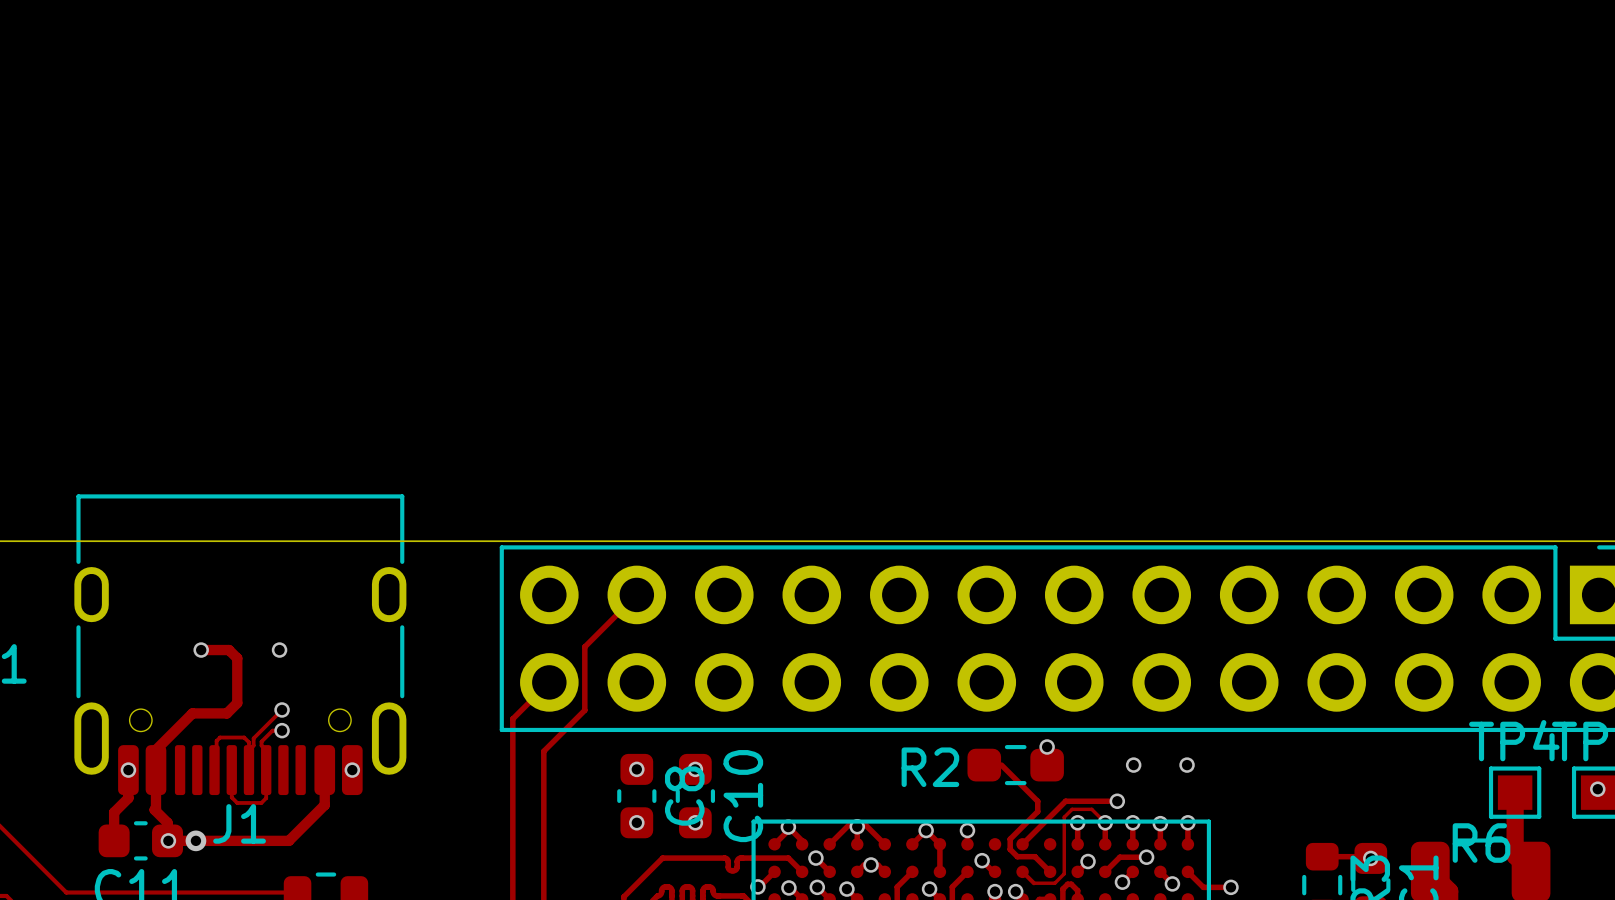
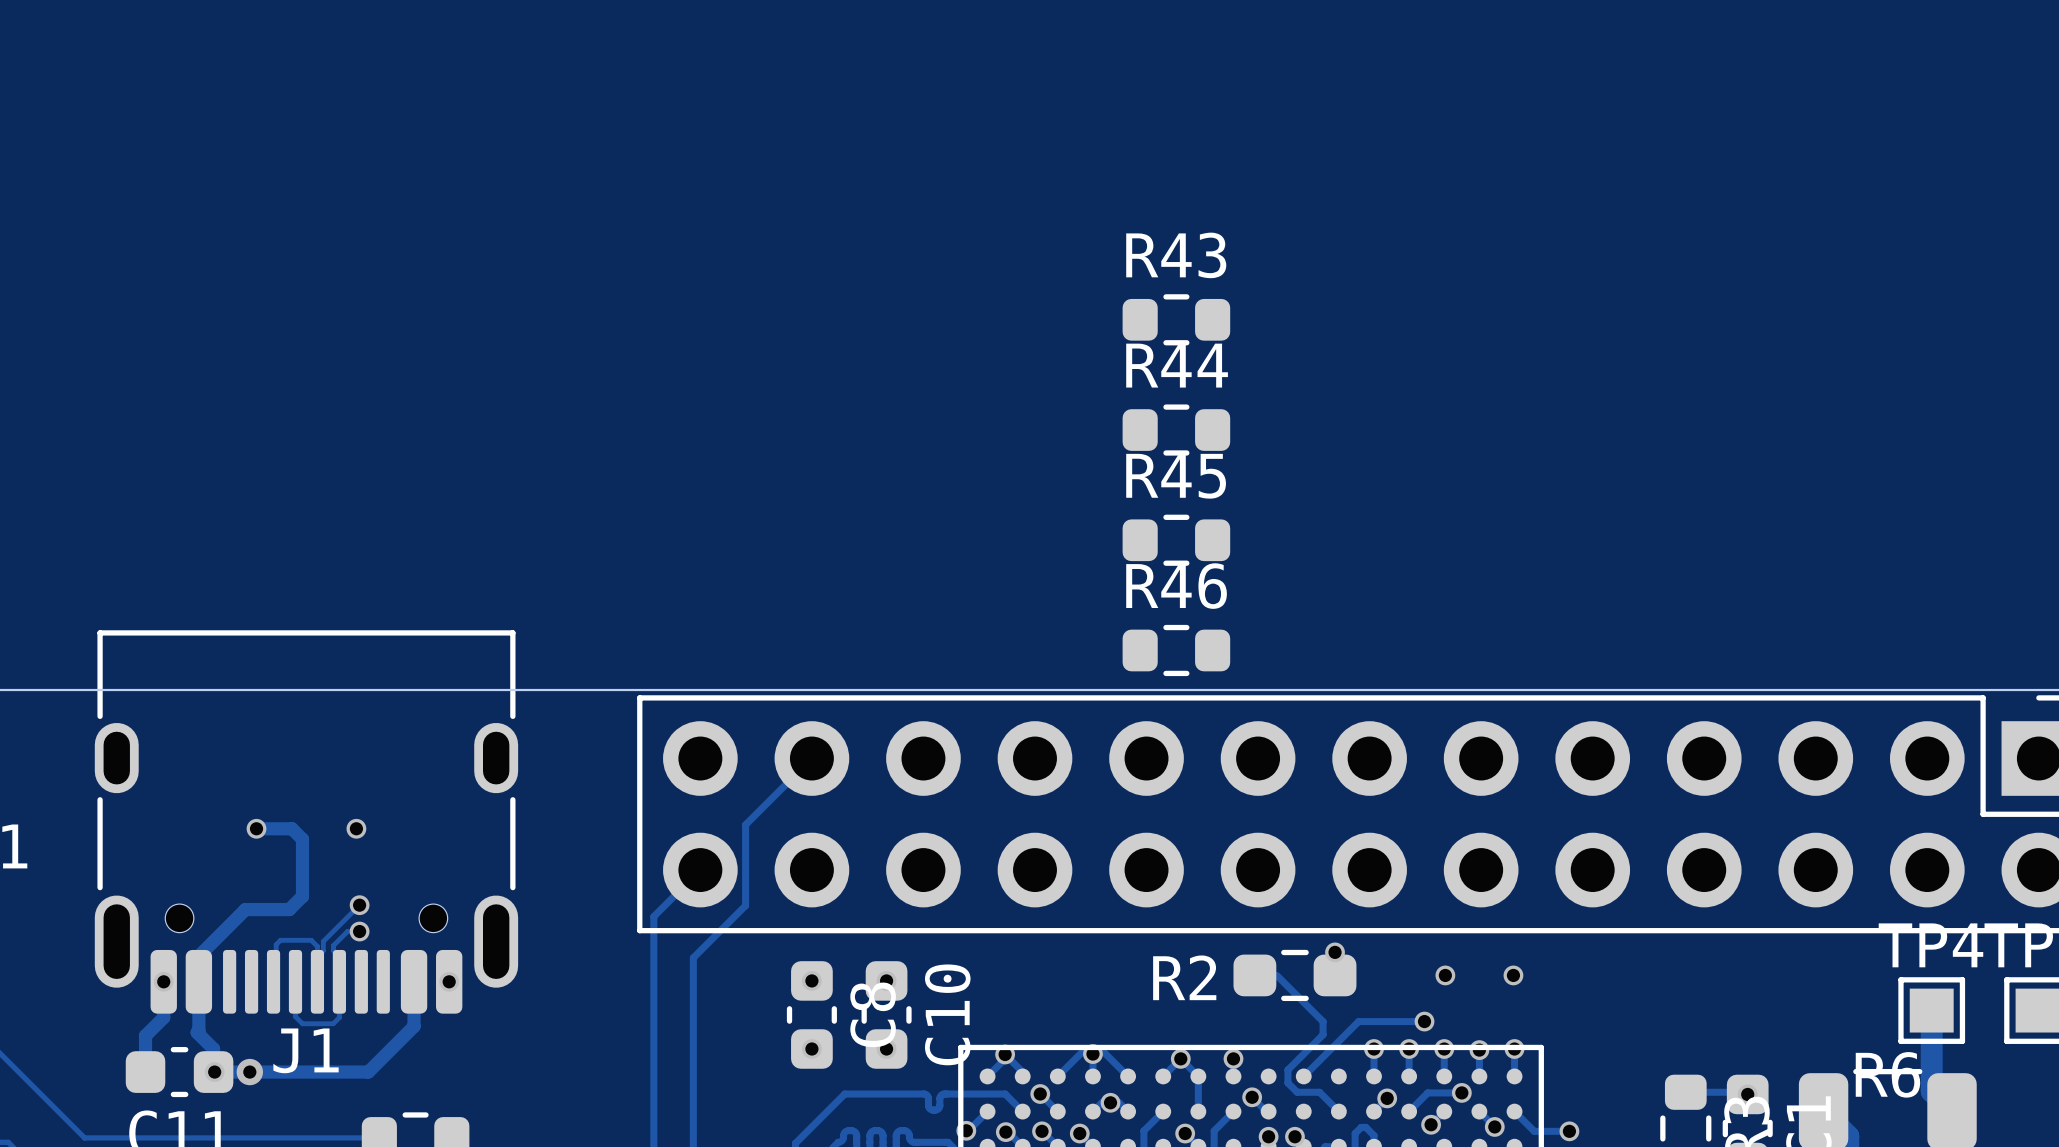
R43: none -> (1176, 319)
R44: none -> (1176, 430)
R45: none -> (1176, 540)
R46: none -> (1176, 650)
via: (1597, 789) -> none
track: (1105, 822) (1091, 809) (1072, 809) (1064, 817) (1064, 873) (1054, 883) (1033, 883) (1022, 871) -> none

